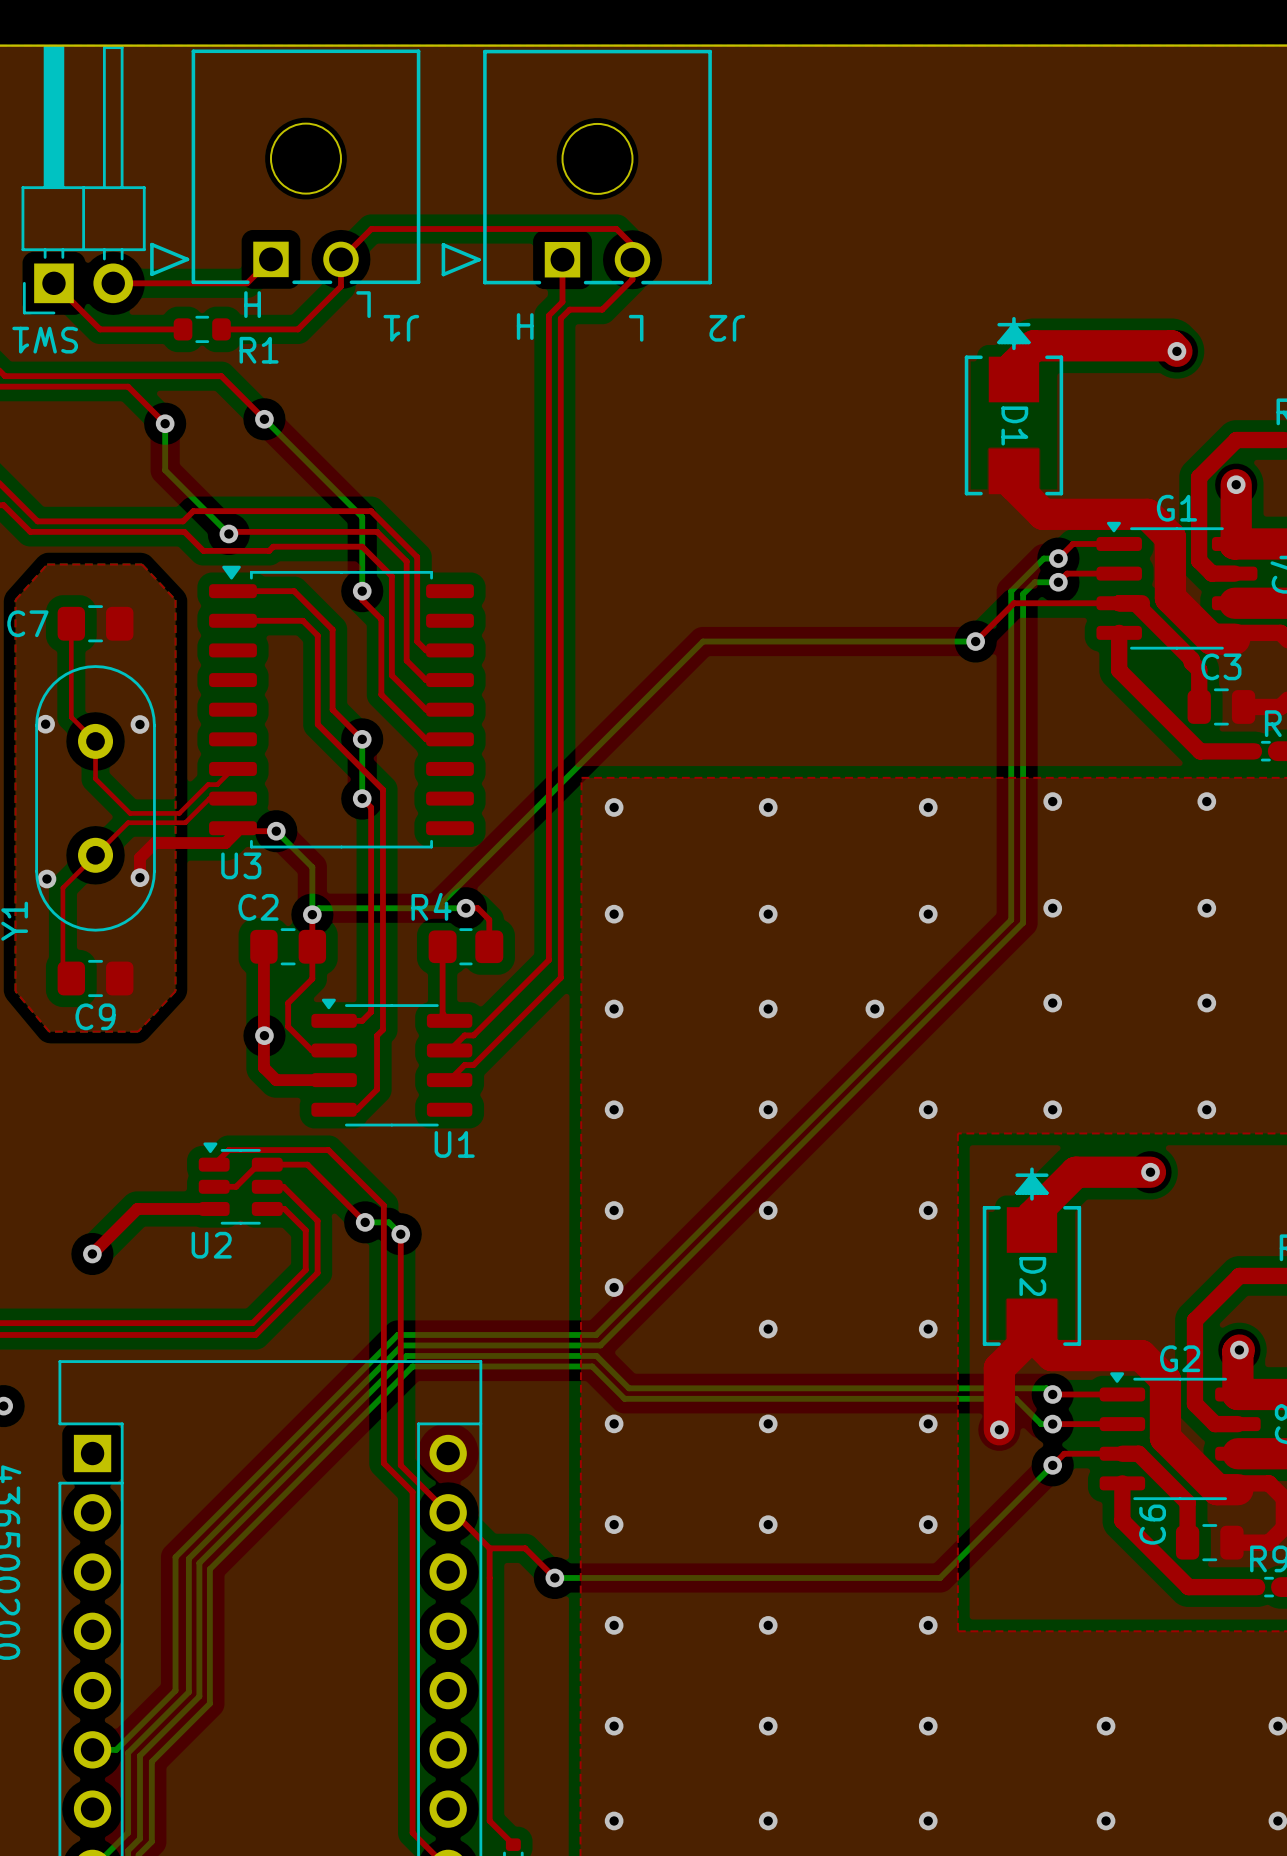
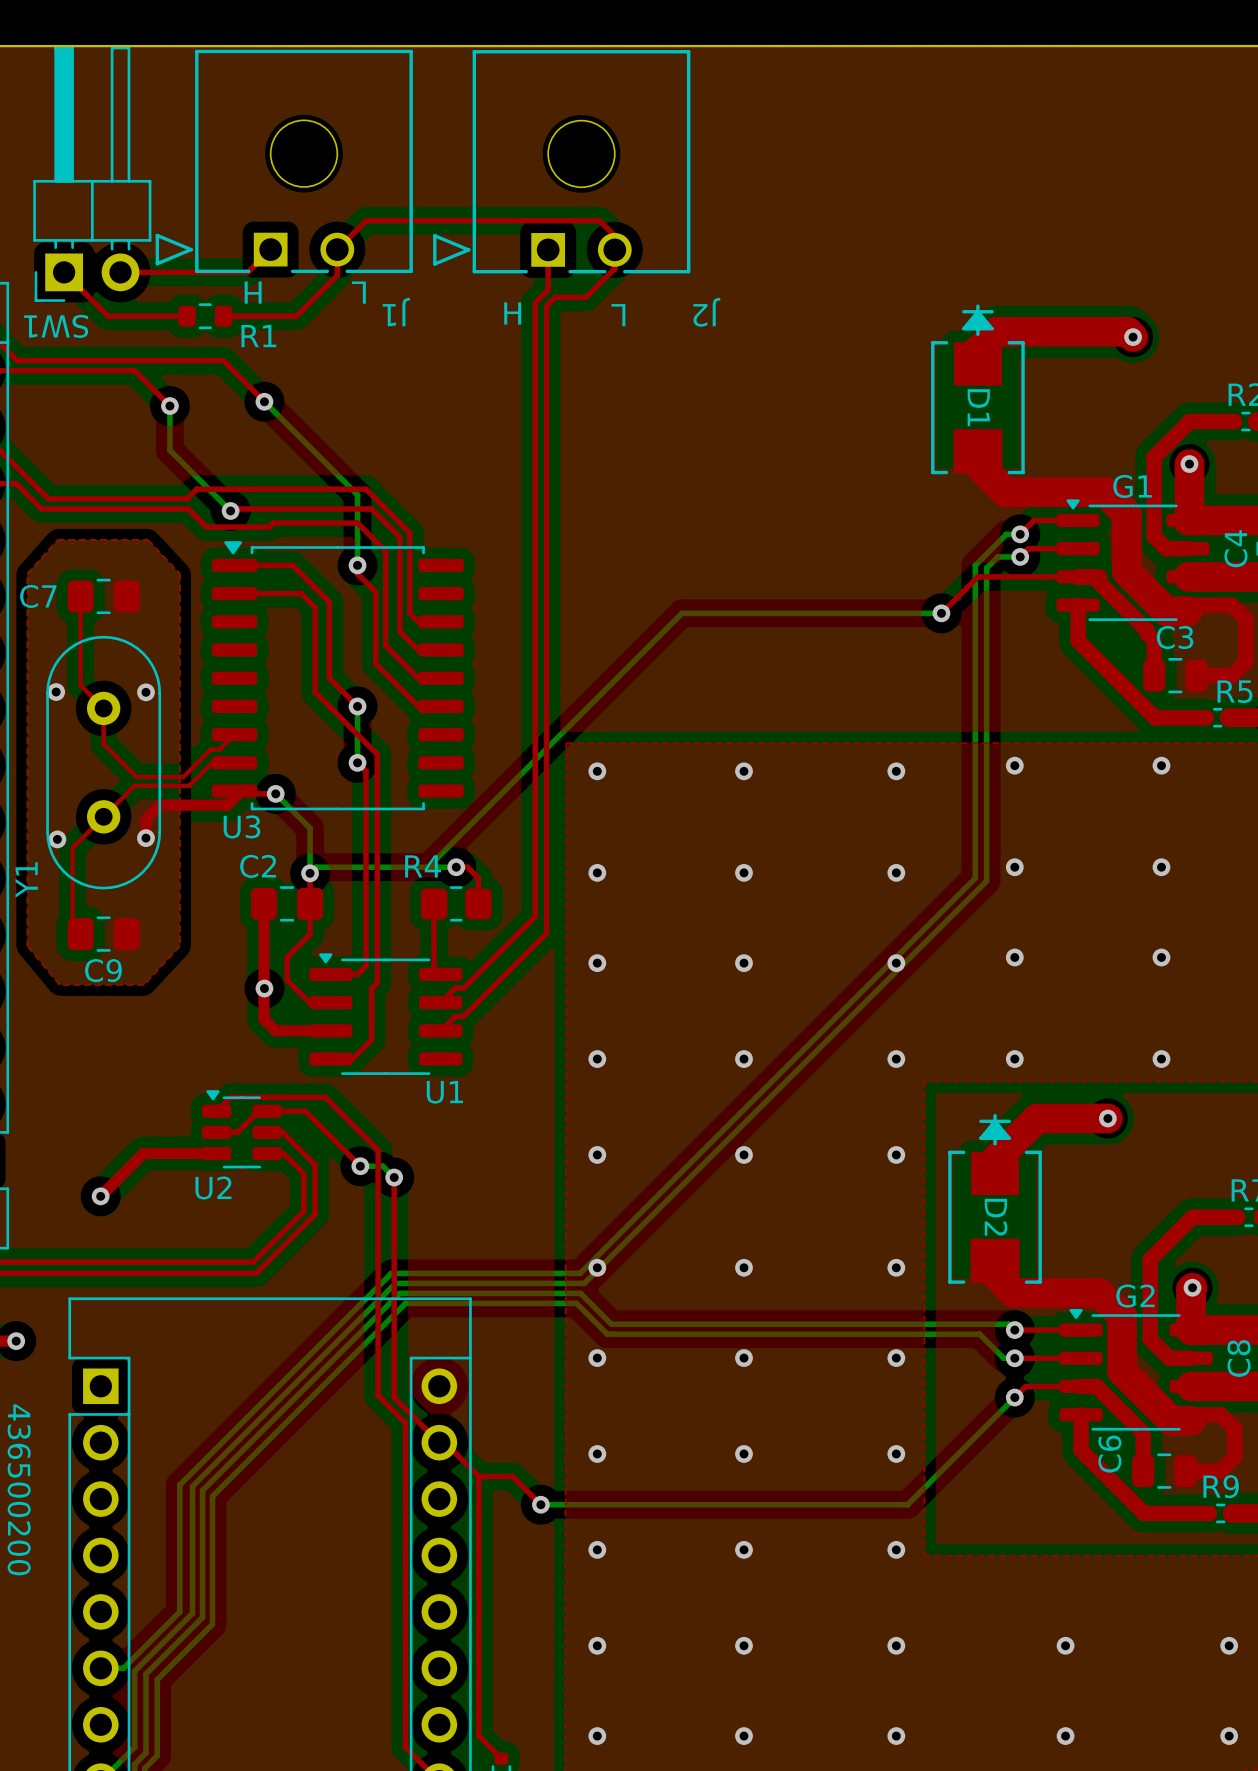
via position: (874, 1009) -> (896, 963)
via position: (614, 1287) -> (597, 1267)
top track: (1031, 1335) (999, 1368) (999, 1429) -> none
via: (999, 1429) -> none

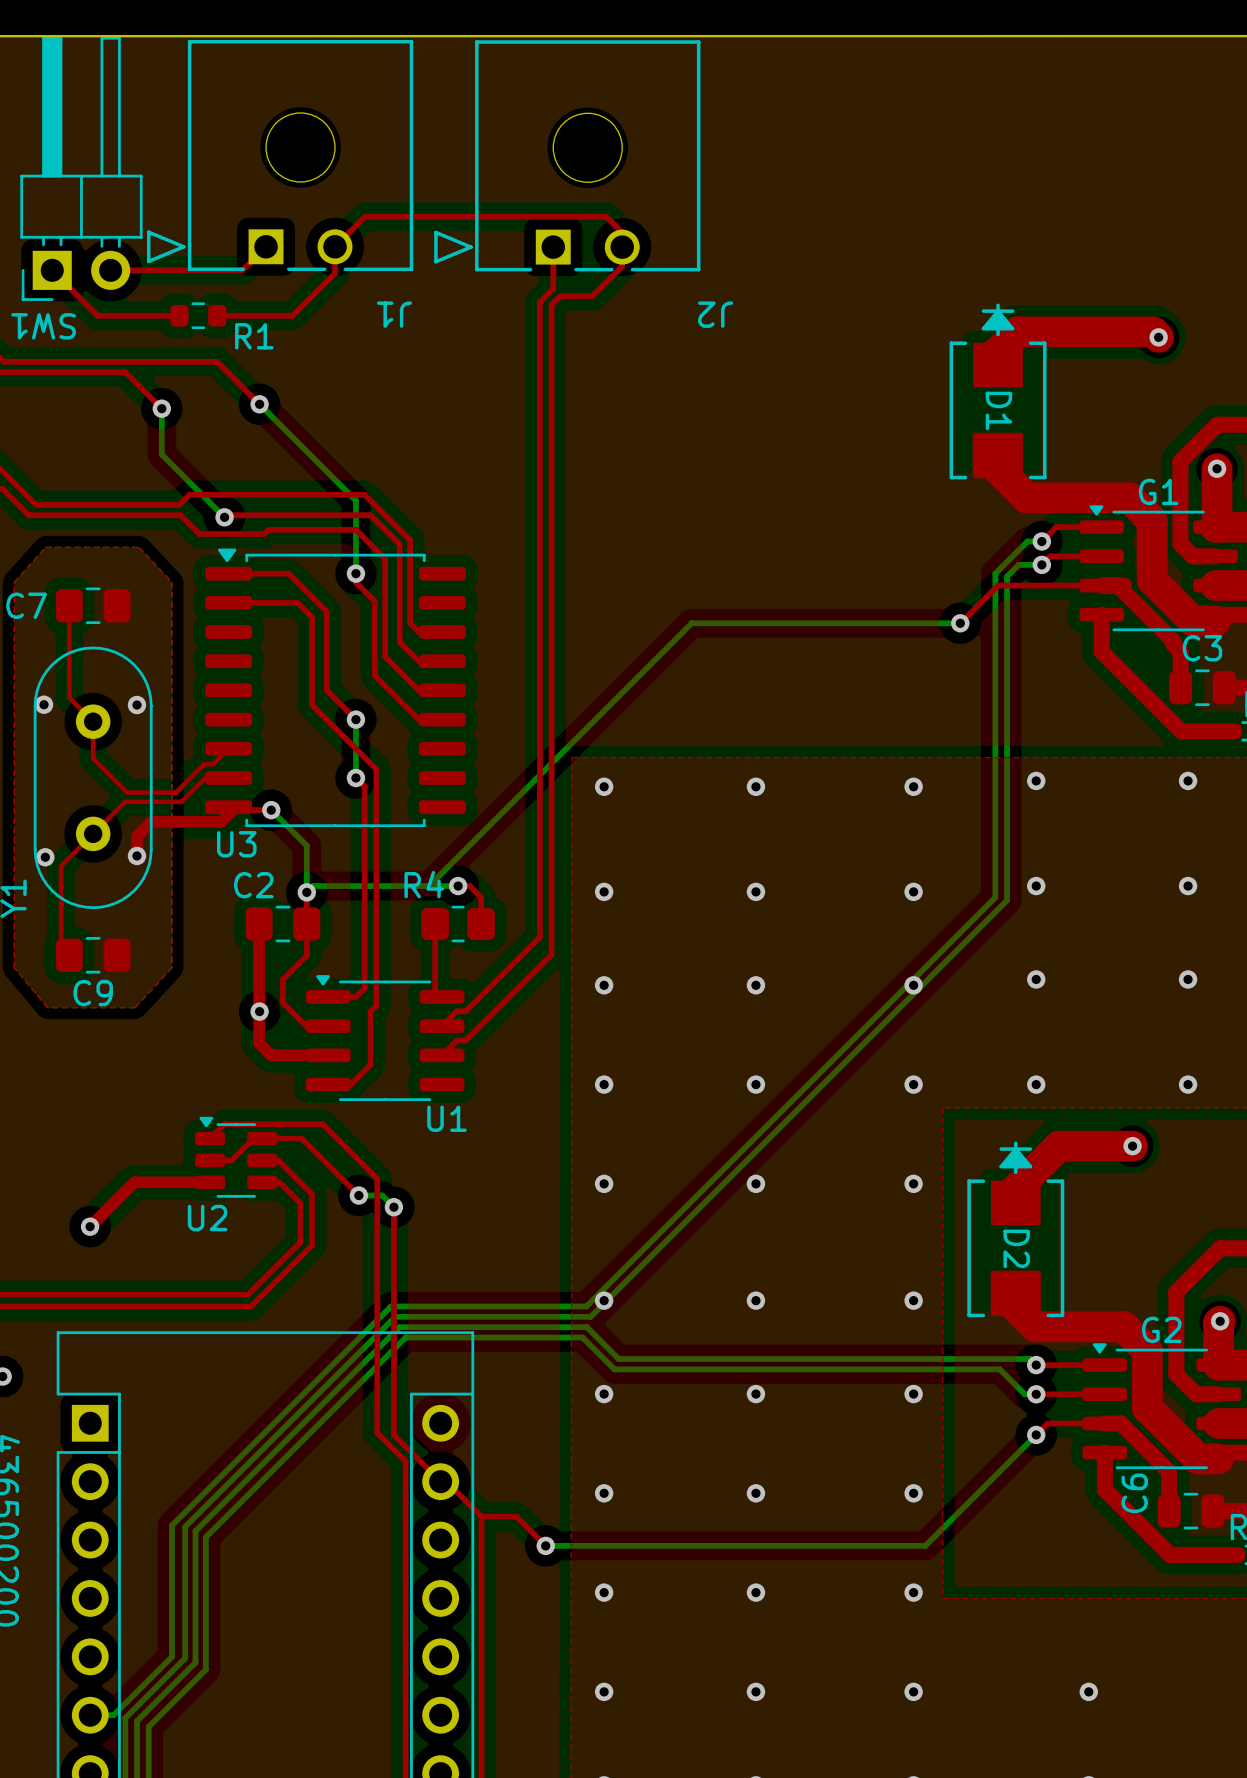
text: H (253, 292) -> none
text: L (358, 292) -> none
text: H (512, 313) -> none
text: L (618, 315) -> none

